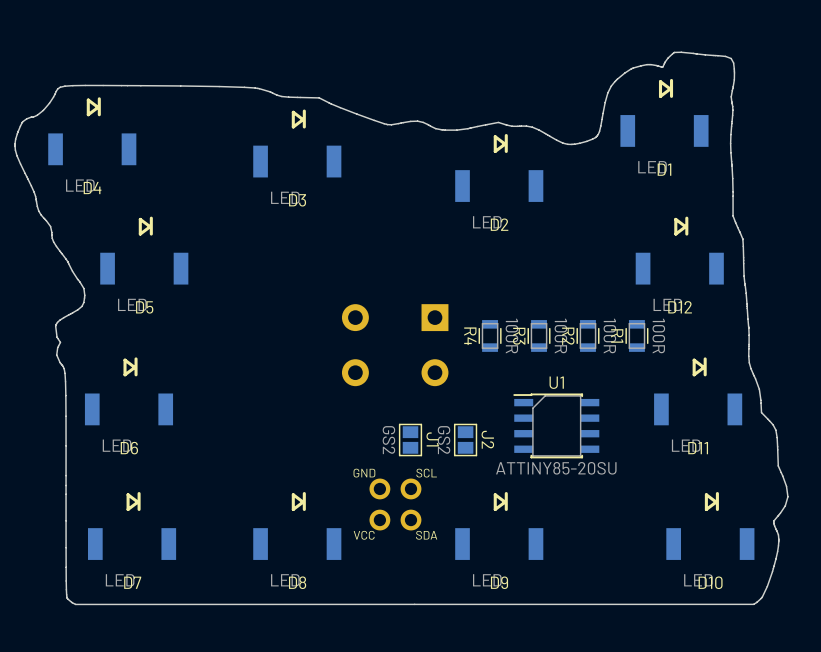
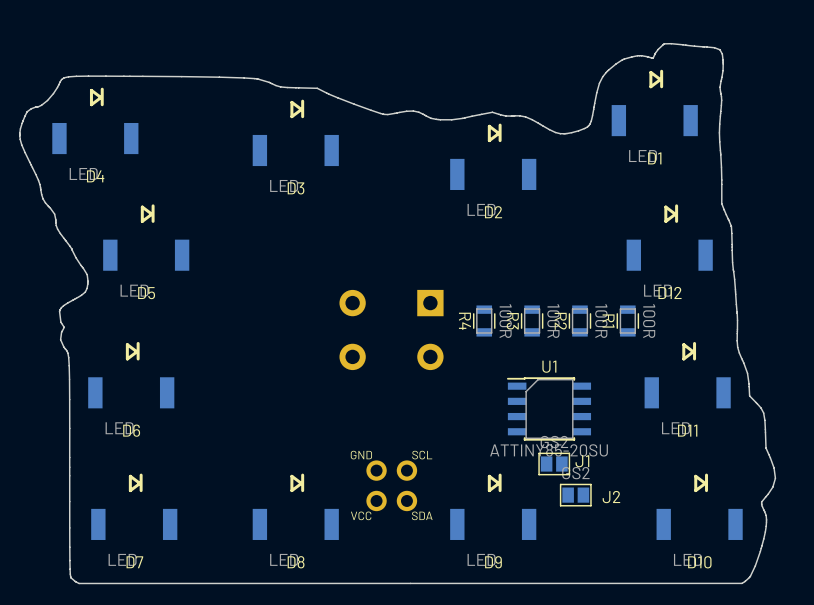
J1 rotation: 0° (410, 440) -> 90° clockwise (554, 464)
J1 position: (410, 440) -> (554, 464)
J2 rotation: 0° (465, 440) -> 90° clockwise (575, 495)
J2 position: (465, 440) -> (575, 495)

